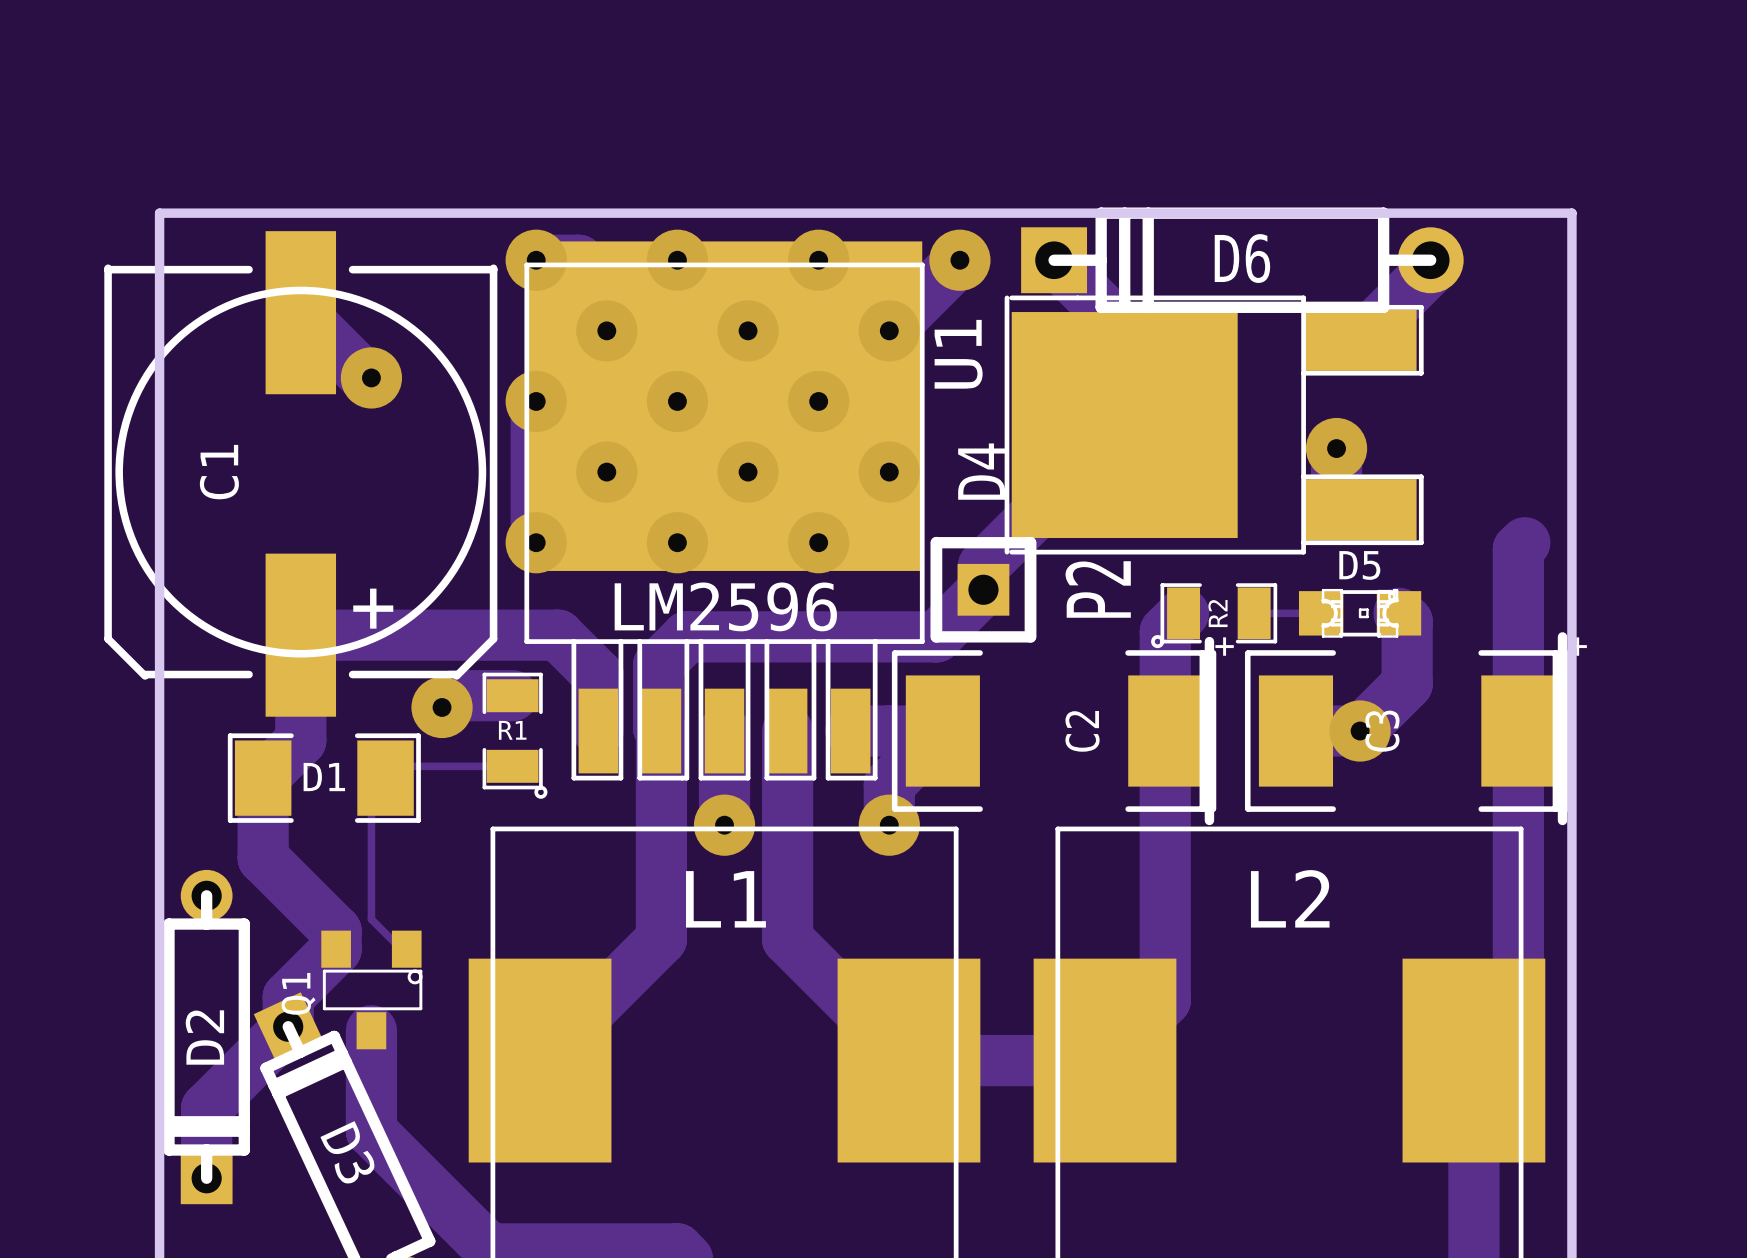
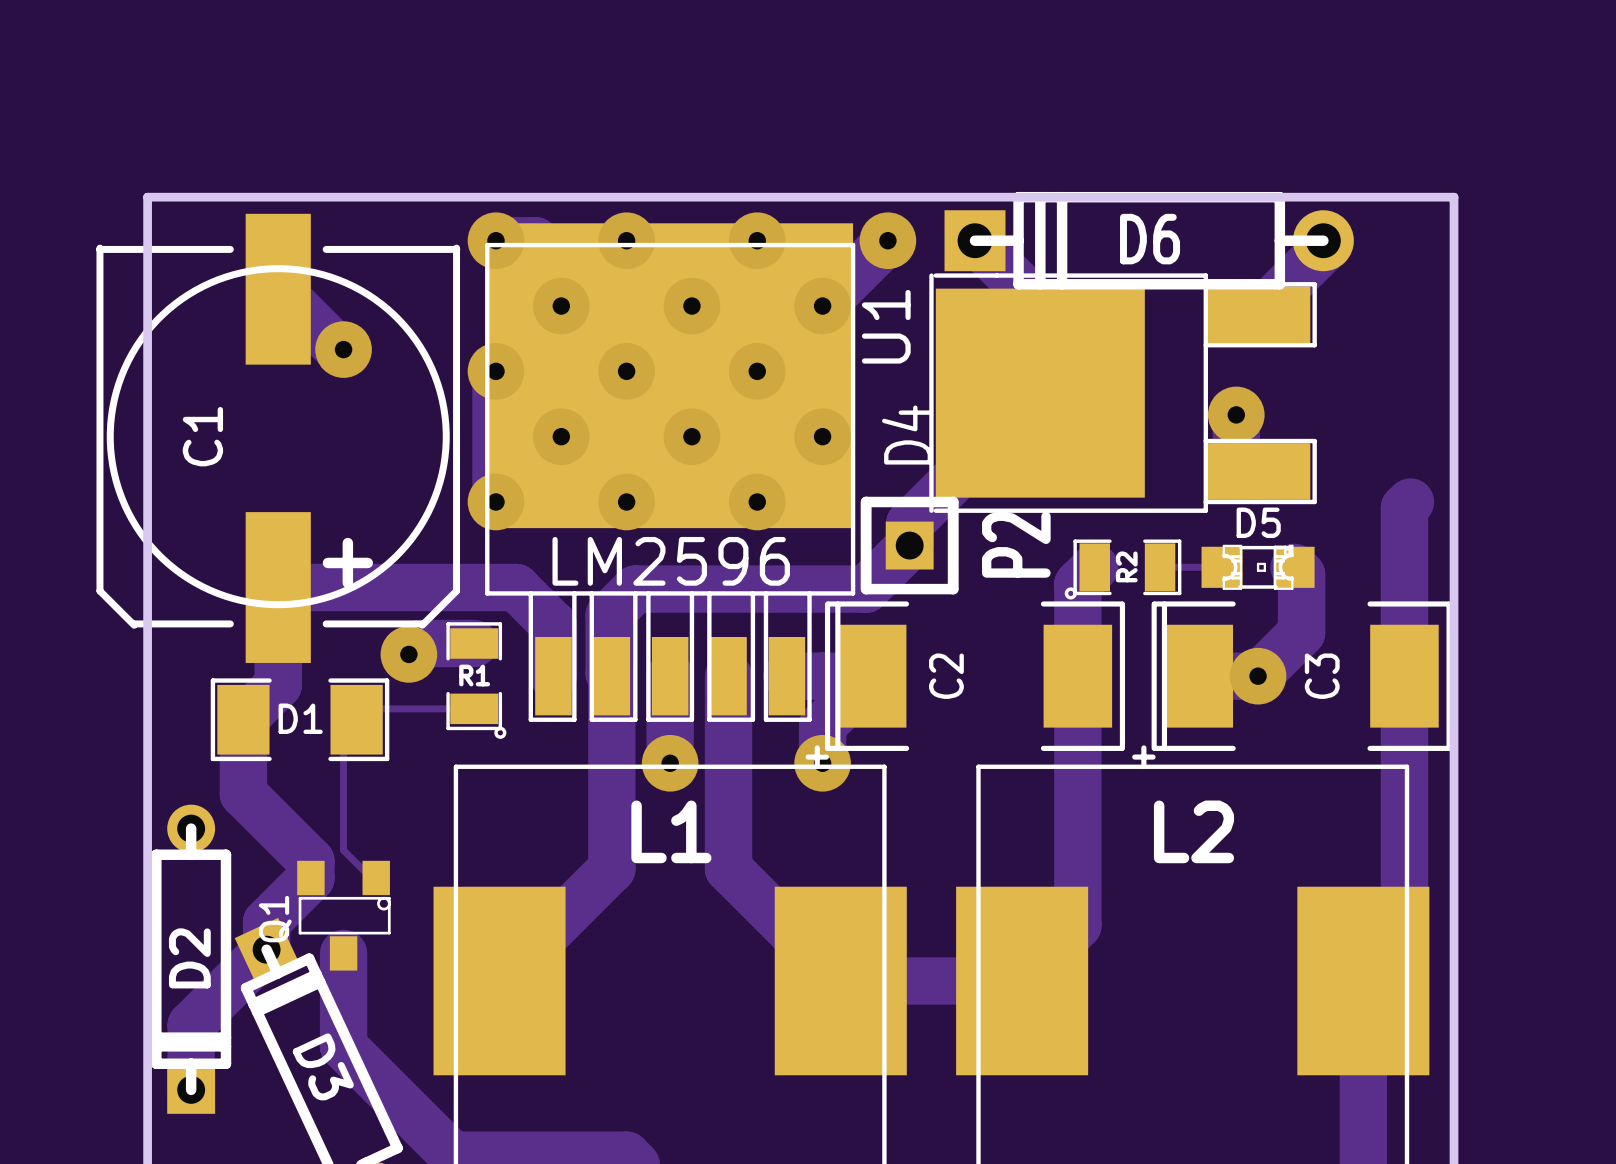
line: (1562, 636) (1562, 820) -> none
line: (1209, 641) (1209, 820) -> none
C2 rotation: 0° (1054, 731) -> 180° (975, 676)
C3 rotation: 0° (1407, 731) -> 180° (1301, 676)

